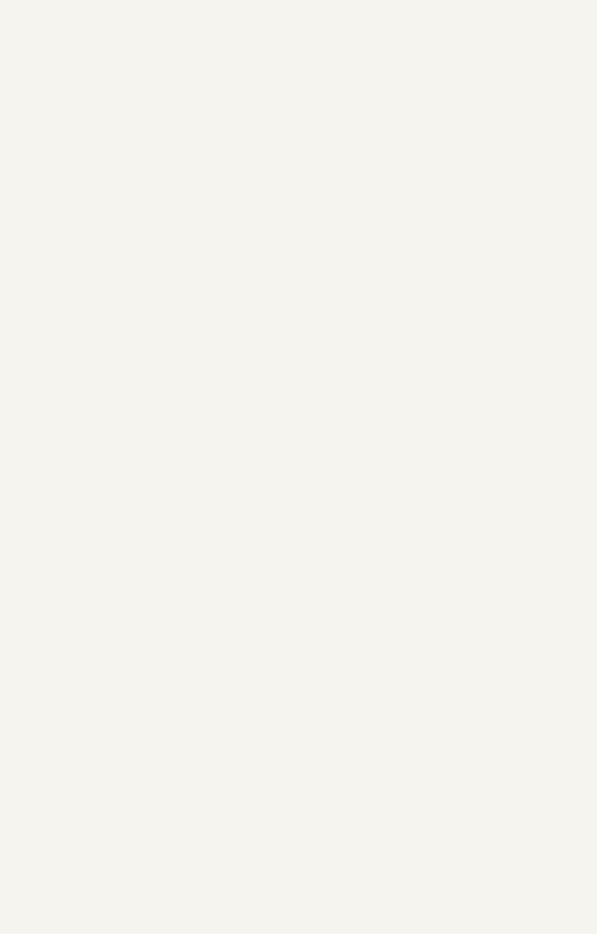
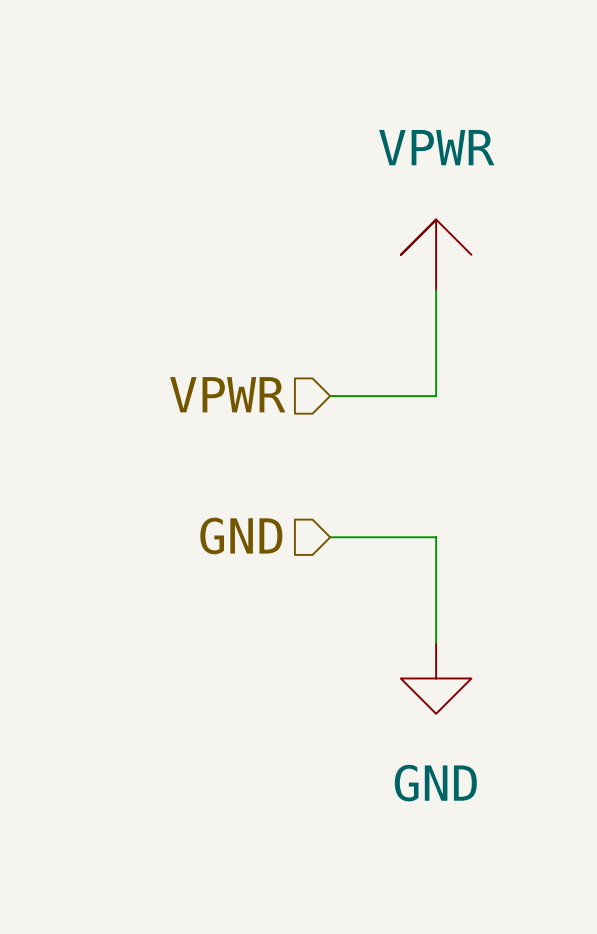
power symbol: none -> VPWR (436, 254)
wire: none -> (436, 290) (436, 396) (330, 396)
hierarchical label: none -> VPWR (227, 394)
hierarchical label: none -> GND (241, 535)
wire: none -> (330, 537) (436, 537) (436, 643)
power symbol: none -> GND (436, 678)

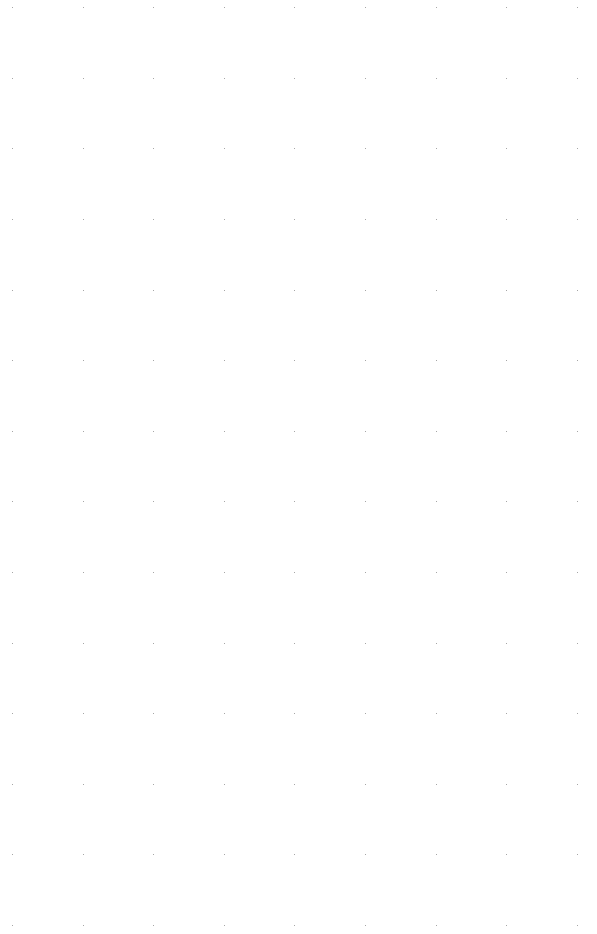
power symbol: VPWR (436, 254) -> none
wire: (436, 290) (436, 396) (330, 396) -> none
hierarchical label: VPWR (227, 394) -> none
hierarchical label: GND (241, 535) -> none
wire: (330, 537) (436, 537) (436, 643) -> none
power symbol: GND (436, 678) -> none

